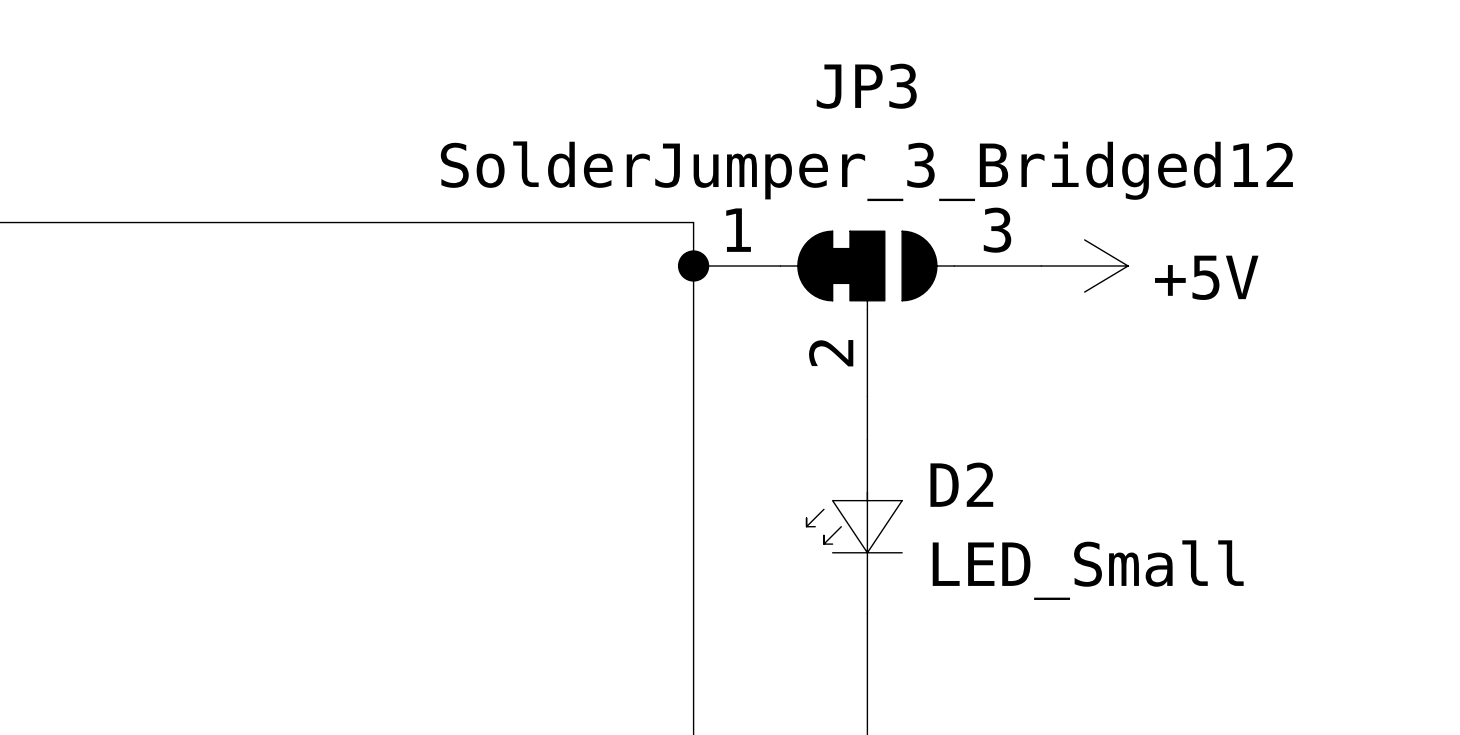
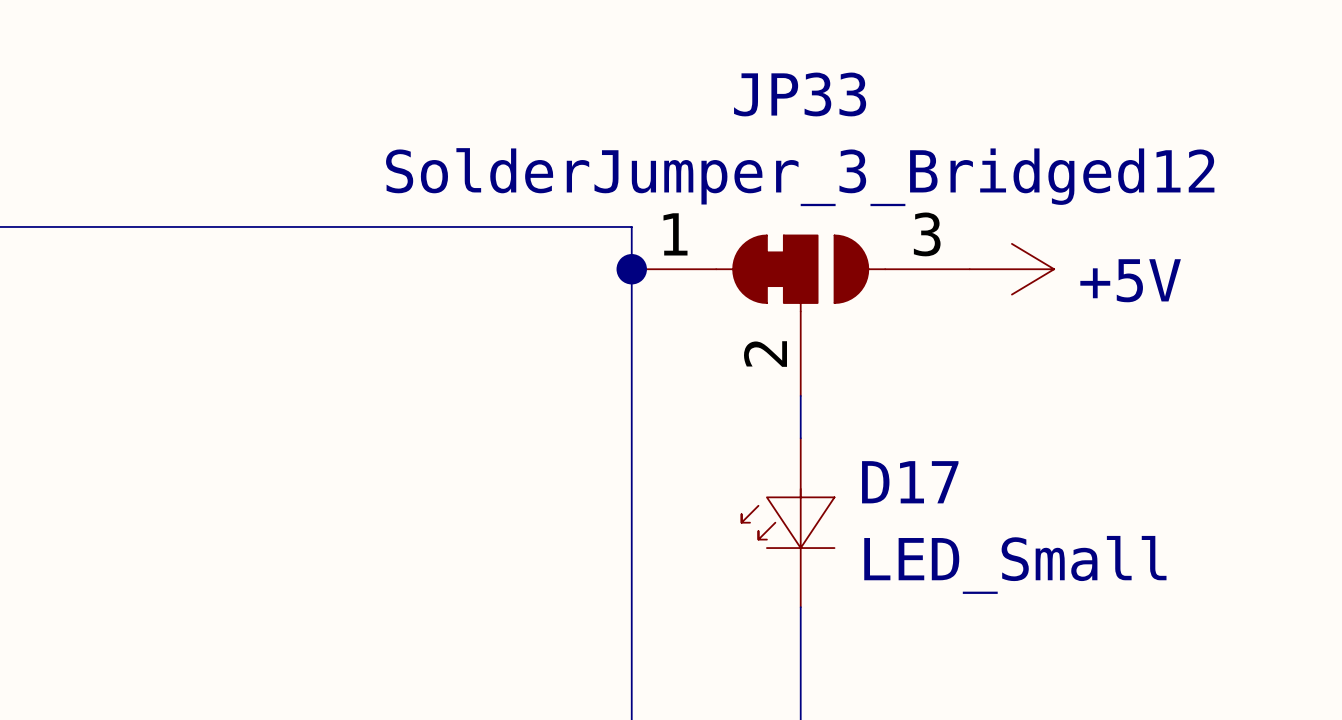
JP3 name: JP3 (866, 86) -> JP33 (800, 94)
D2 name: D2 (961, 484) -> D17 (910, 482)

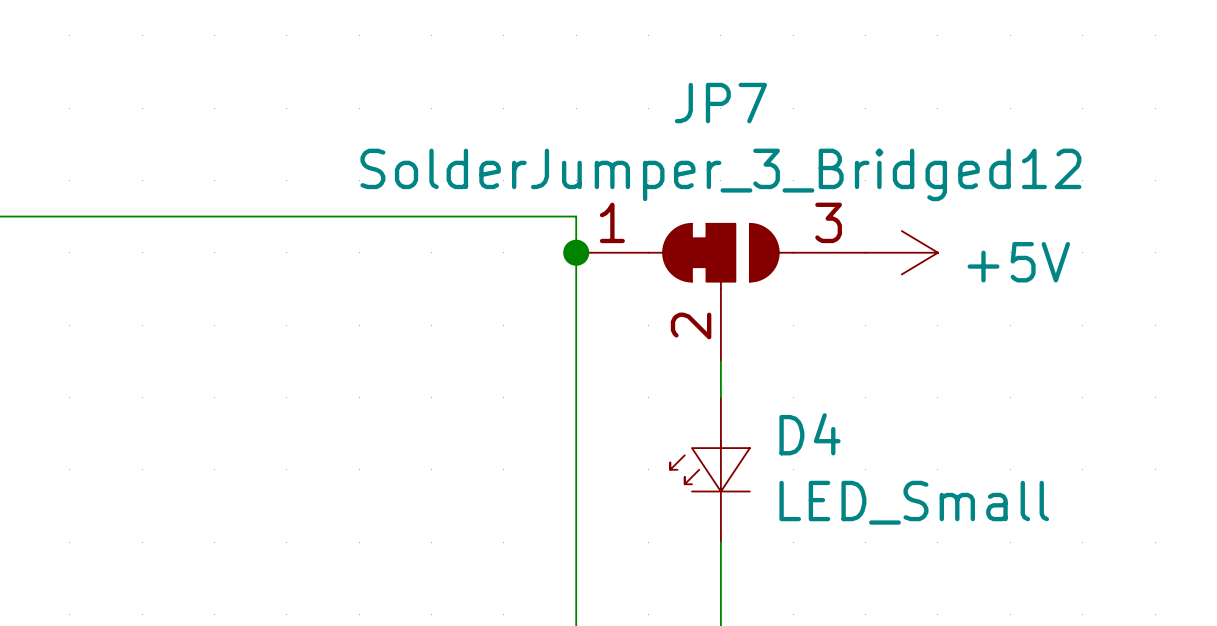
JP33 name: JP33 (800, 94) -> JP7 (720, 103)
D17 name: D17 (910, 482) -> D4 (810, 434)

